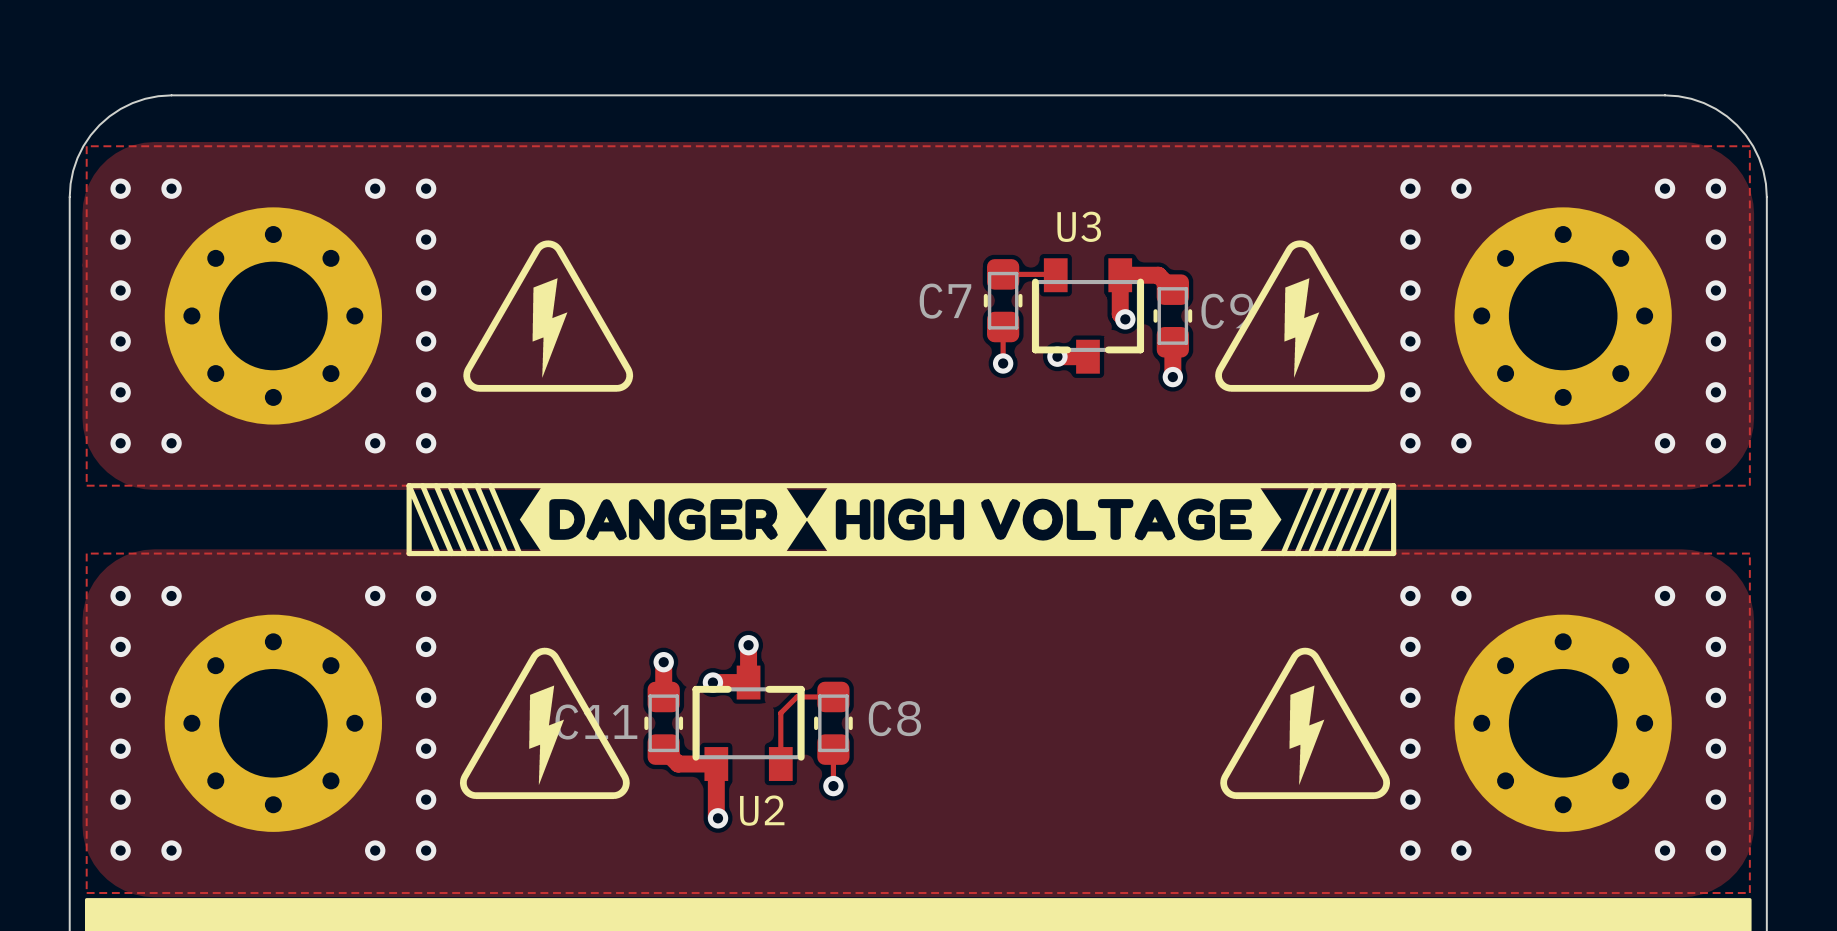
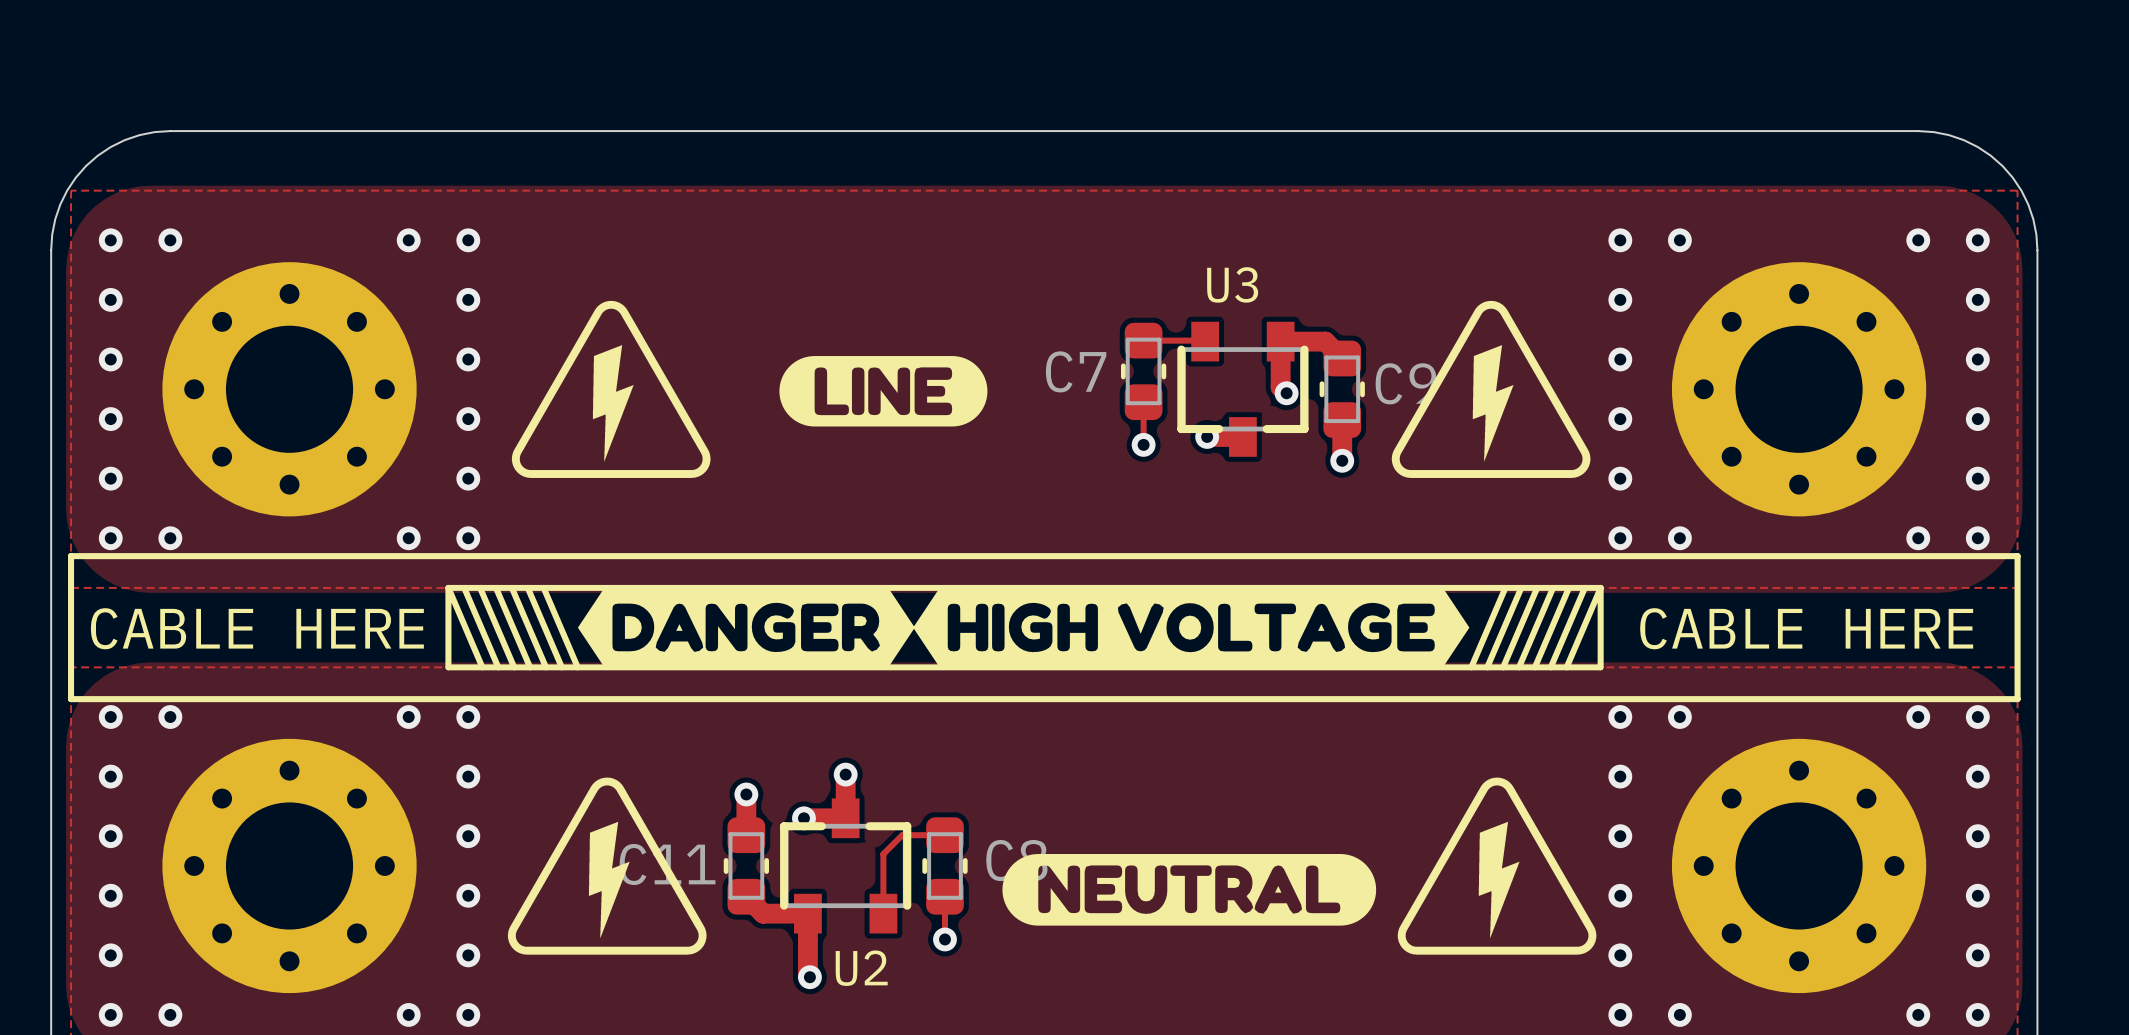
drawing: none -> [779, 356, 988, 427]
line: none -> (71, 556) (2017, 556) (2017, 699) (71, 699) (71, 556)
text: none -> CABLE HERE (257, 628)
text: none -> CABLE HERE (1806, 628)
drawing: none -> [1002, 854, 1377, 926]

